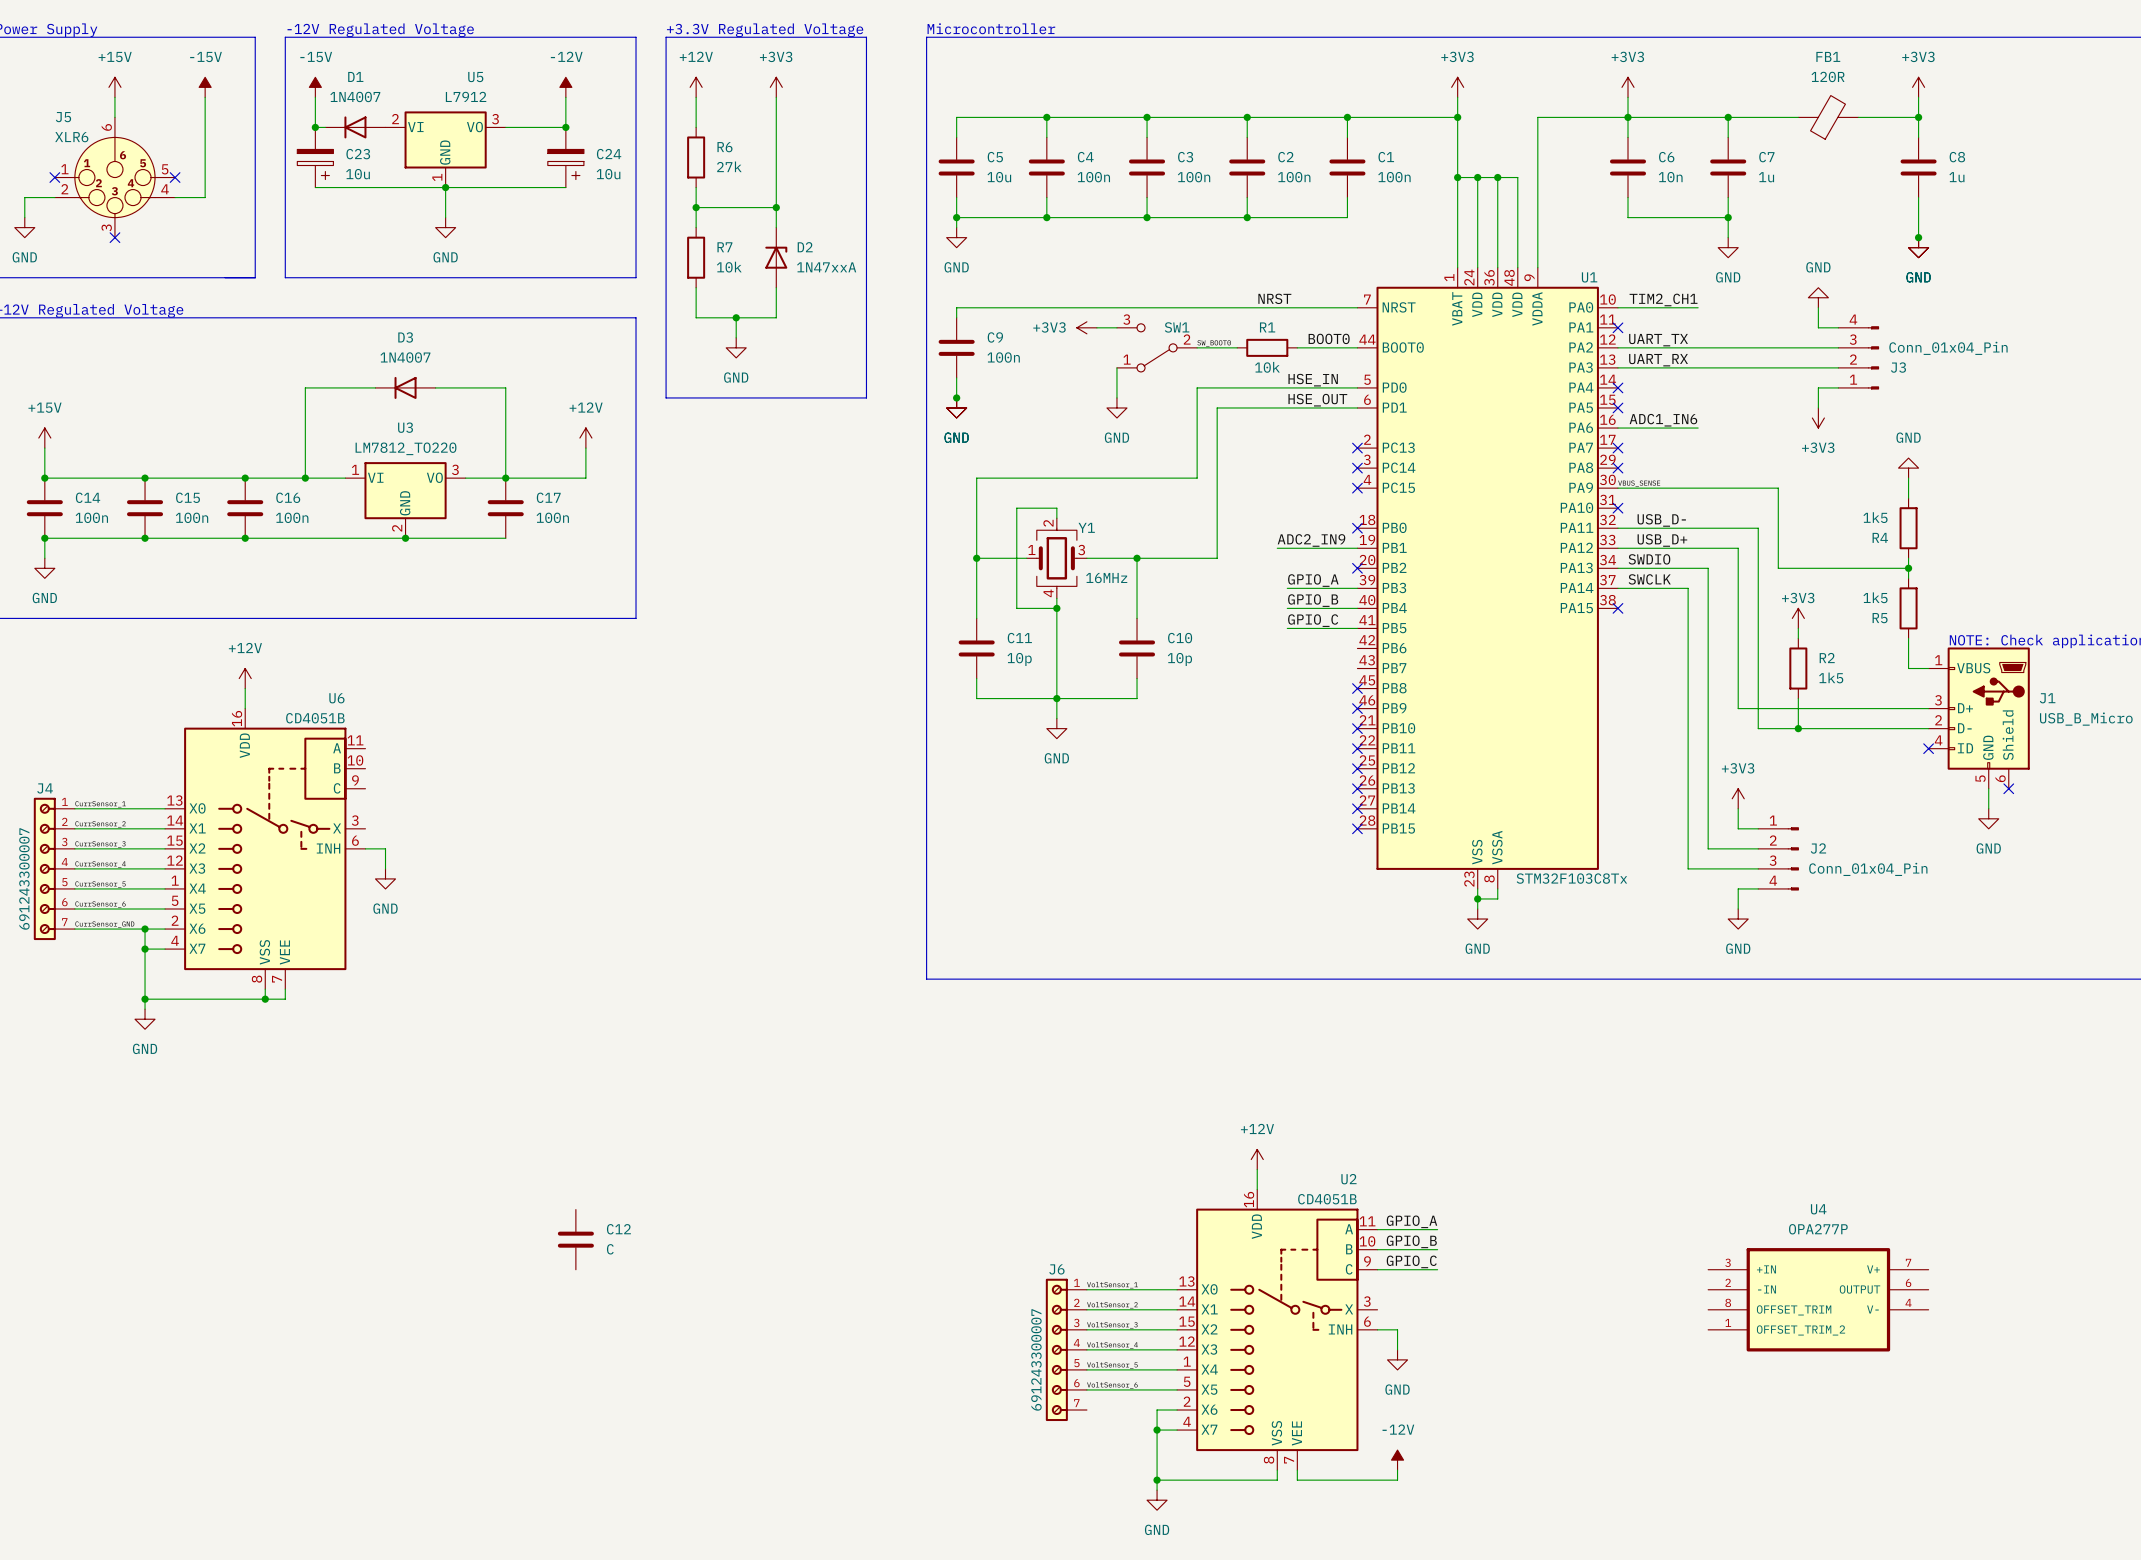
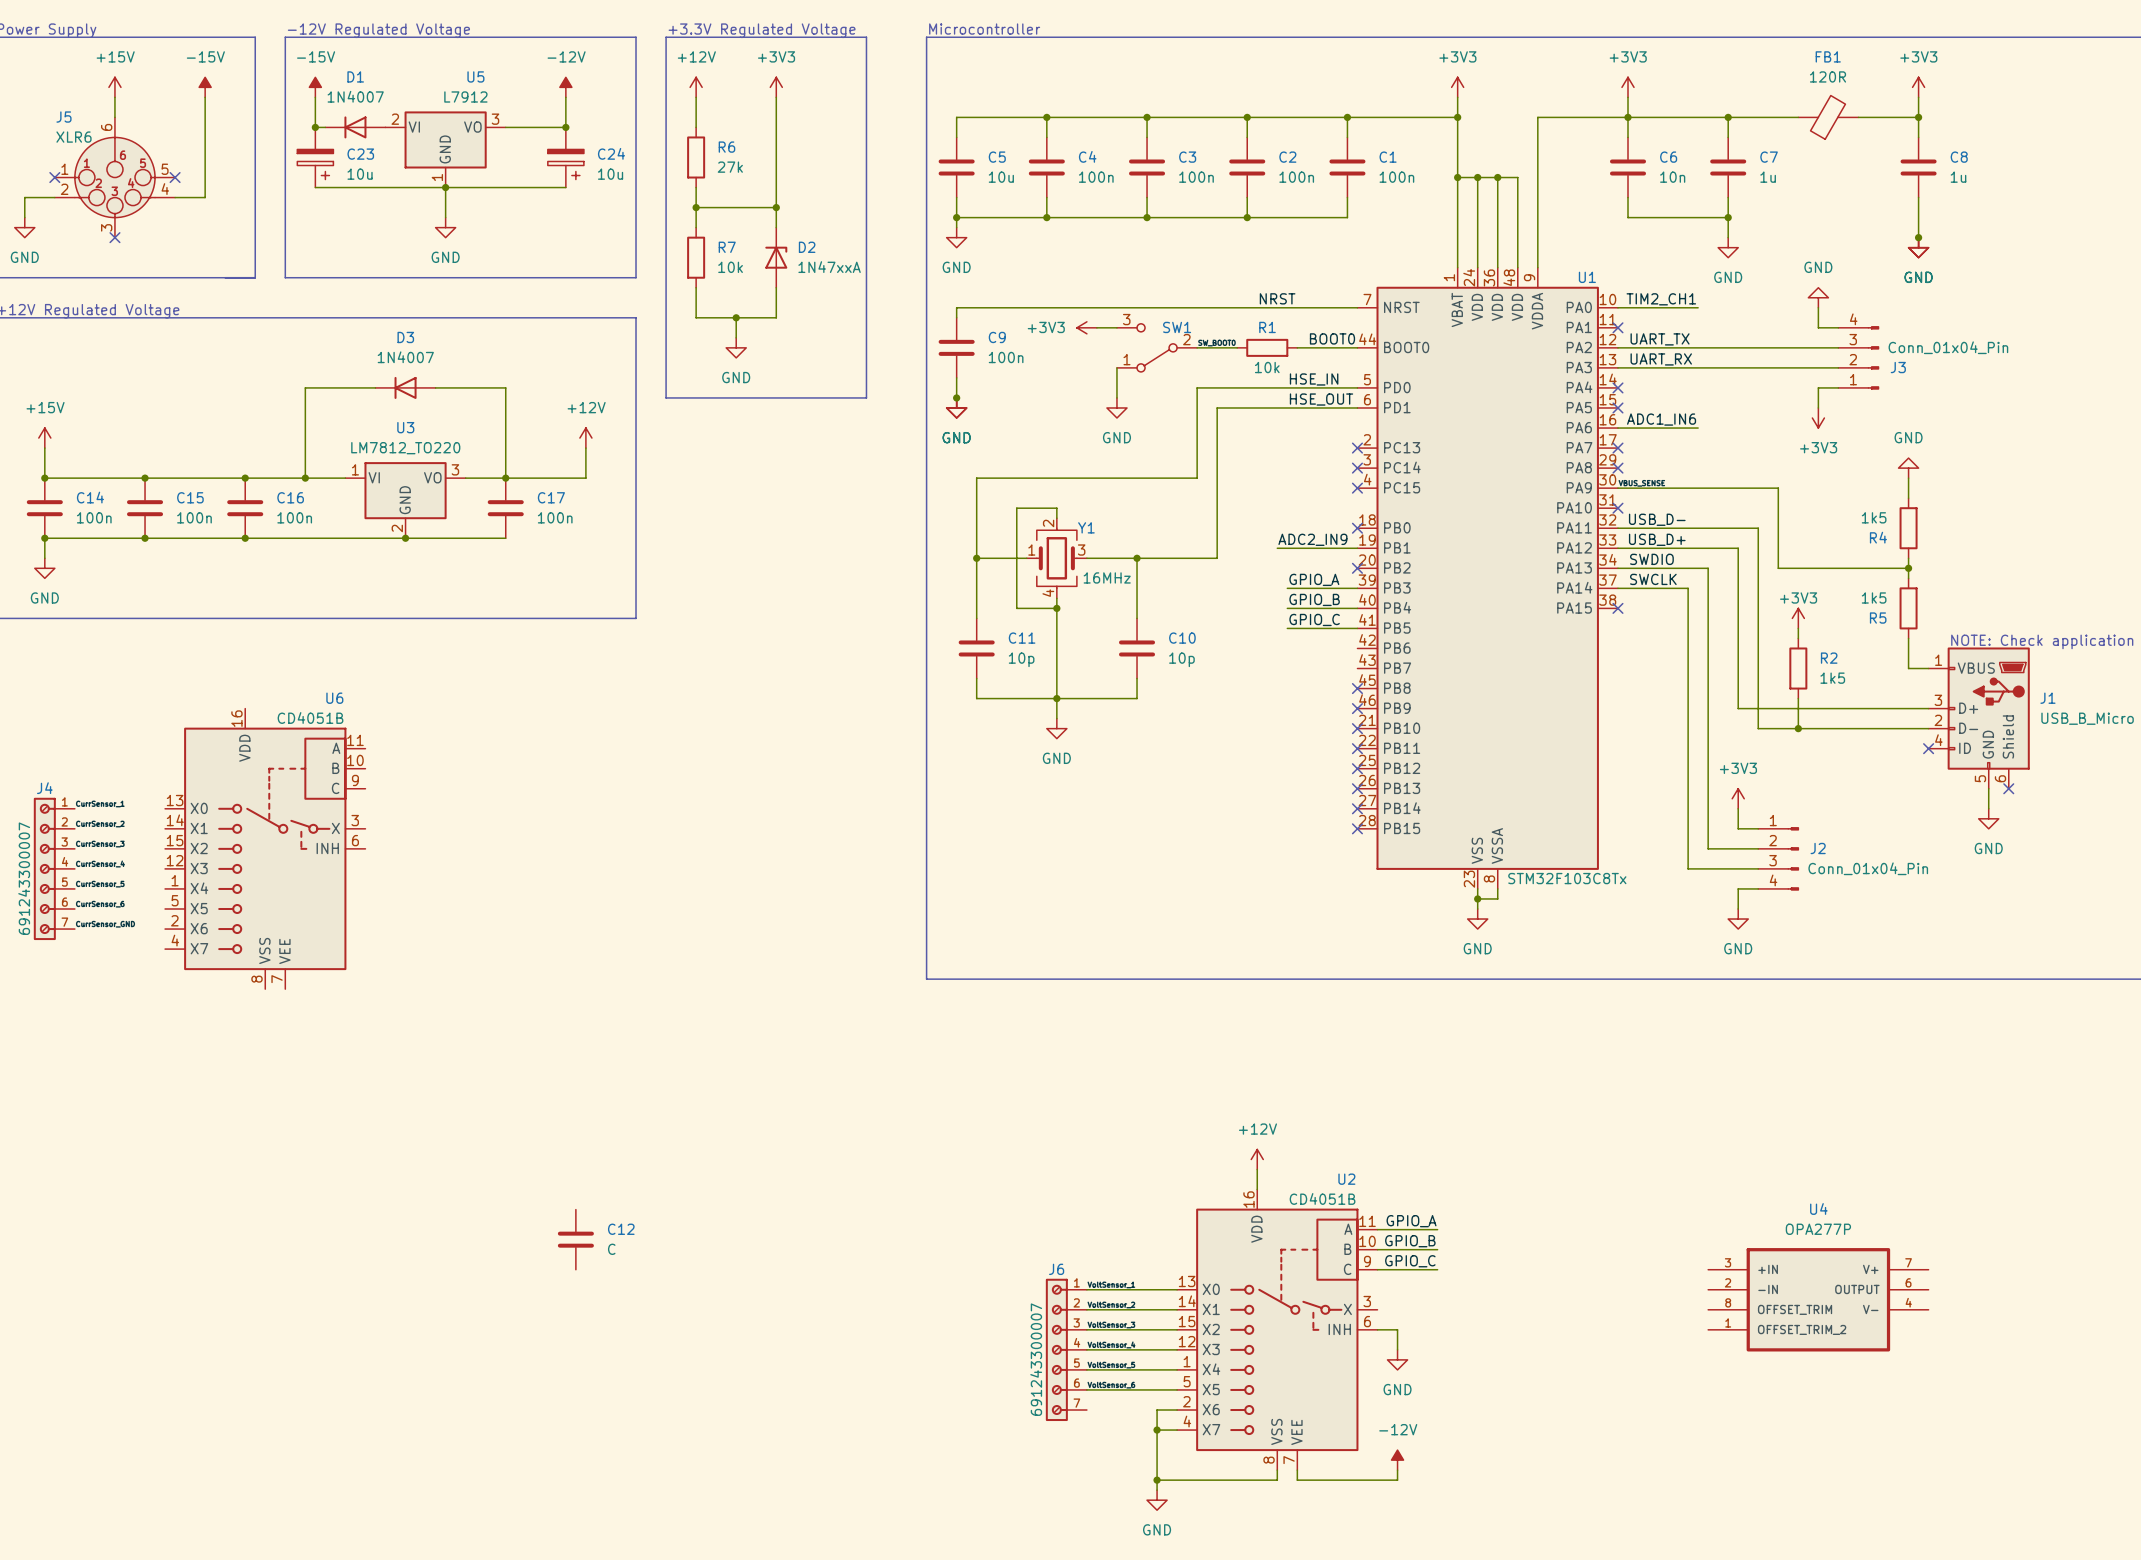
power symbol: +12V (245, 678) -> none
wire: (245, 688) (245, 708) -> none
wire: (74, 808) (165, 808) -> none
wire: (74, 828) (165, 828) -> none
wire: (74, 848) (165, 848) -> none
wire: (365, 848) (385, 848) (385, 868) -> none
wire: (74, 868) (165, 868) -> none
power symbol: GND (385, 878) -> none
wire: (74, 888) (165, 888) -> none
wire: (74, 908) (165, 908) -> none
wire: (74, 929) (165, 929) -> none
wire: (145, 929) (145, 1009) -> none
junction: (145, 929) -> none
wire: (145, 949) (165, 949) -> none
junction: (145, 949) -> none
wire: (265, 989) (265, 999) -> none
wire: (285, 989) (285, 999) (145, 999) -> none
junction: (145, 999) -> none
junction: (265, 999) -> none
power symbol: GND (145, 1019) -> none

